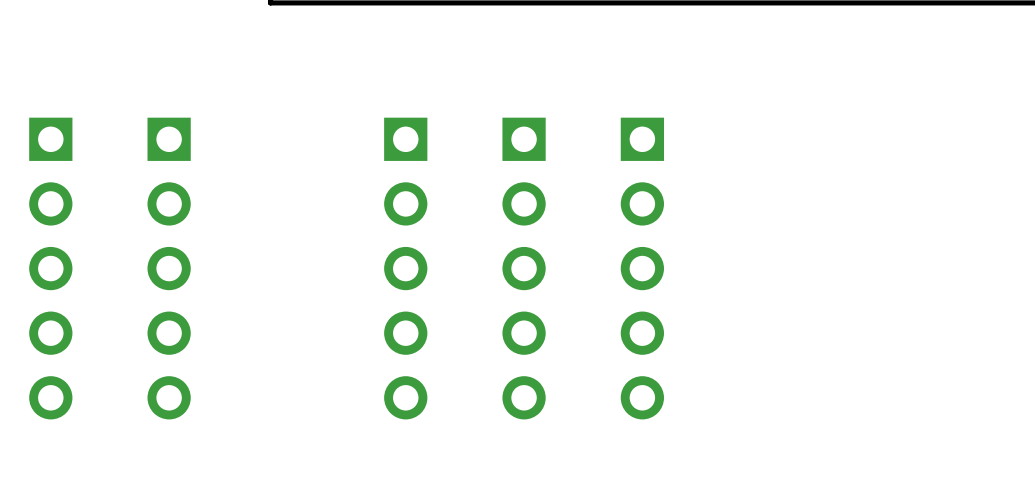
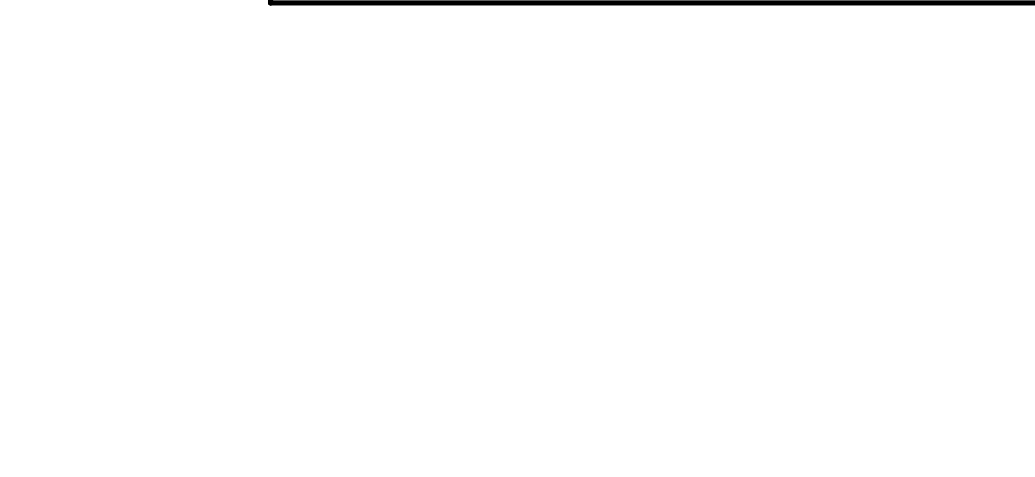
part: (50, 268) -> none
part: (169, 268) -> none
part: (405, 268) -> none
part: (524, 268) -> none
part: (642, 268) -> none

